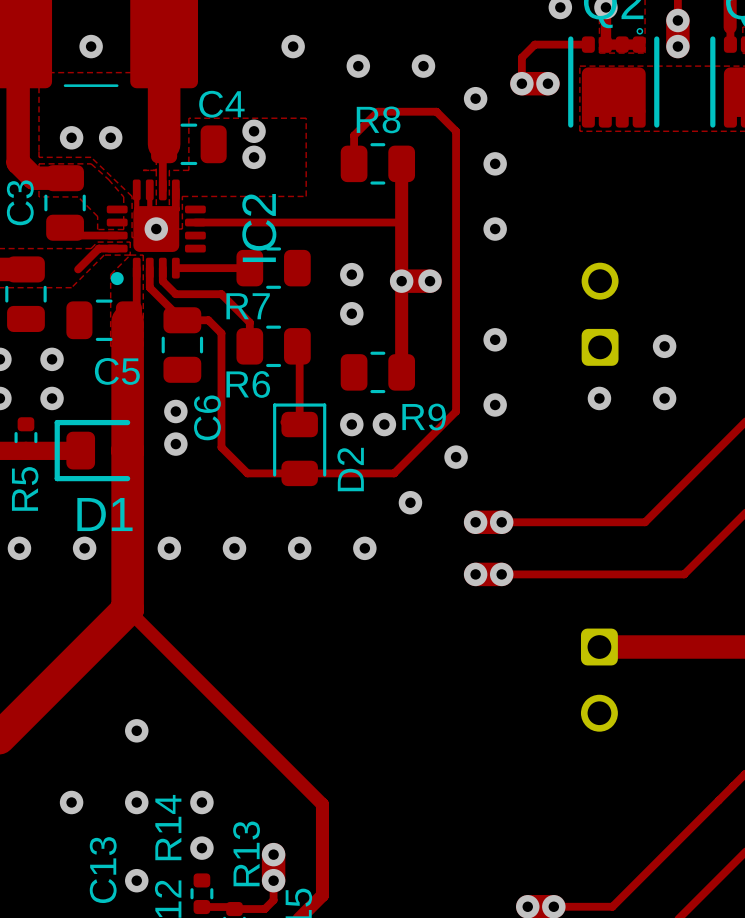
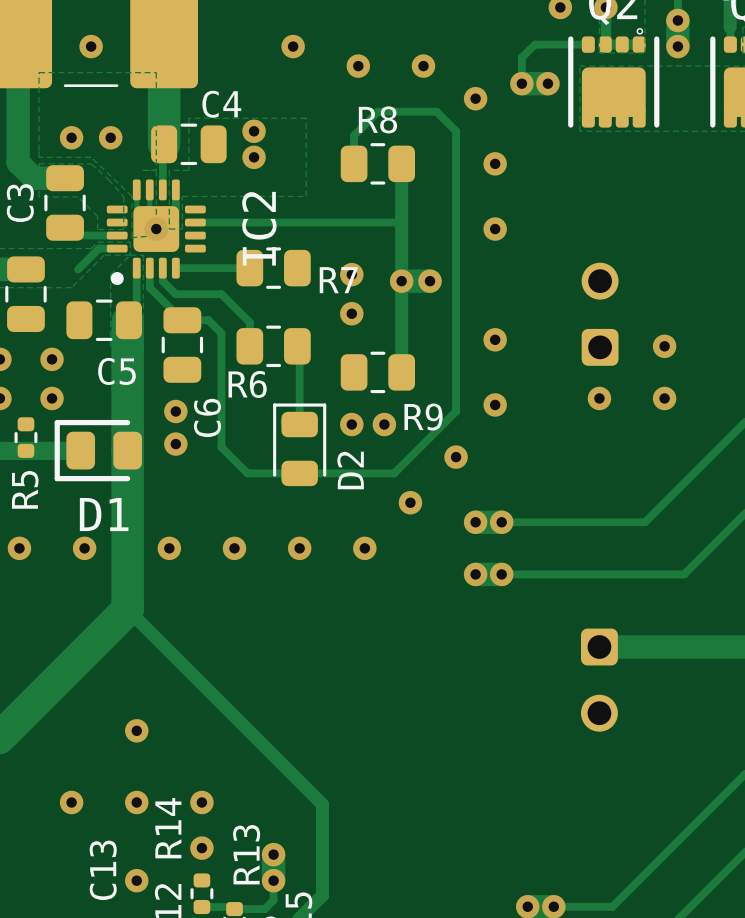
R7 name position: R7 (248, 306) -> R7 (338, 280)

